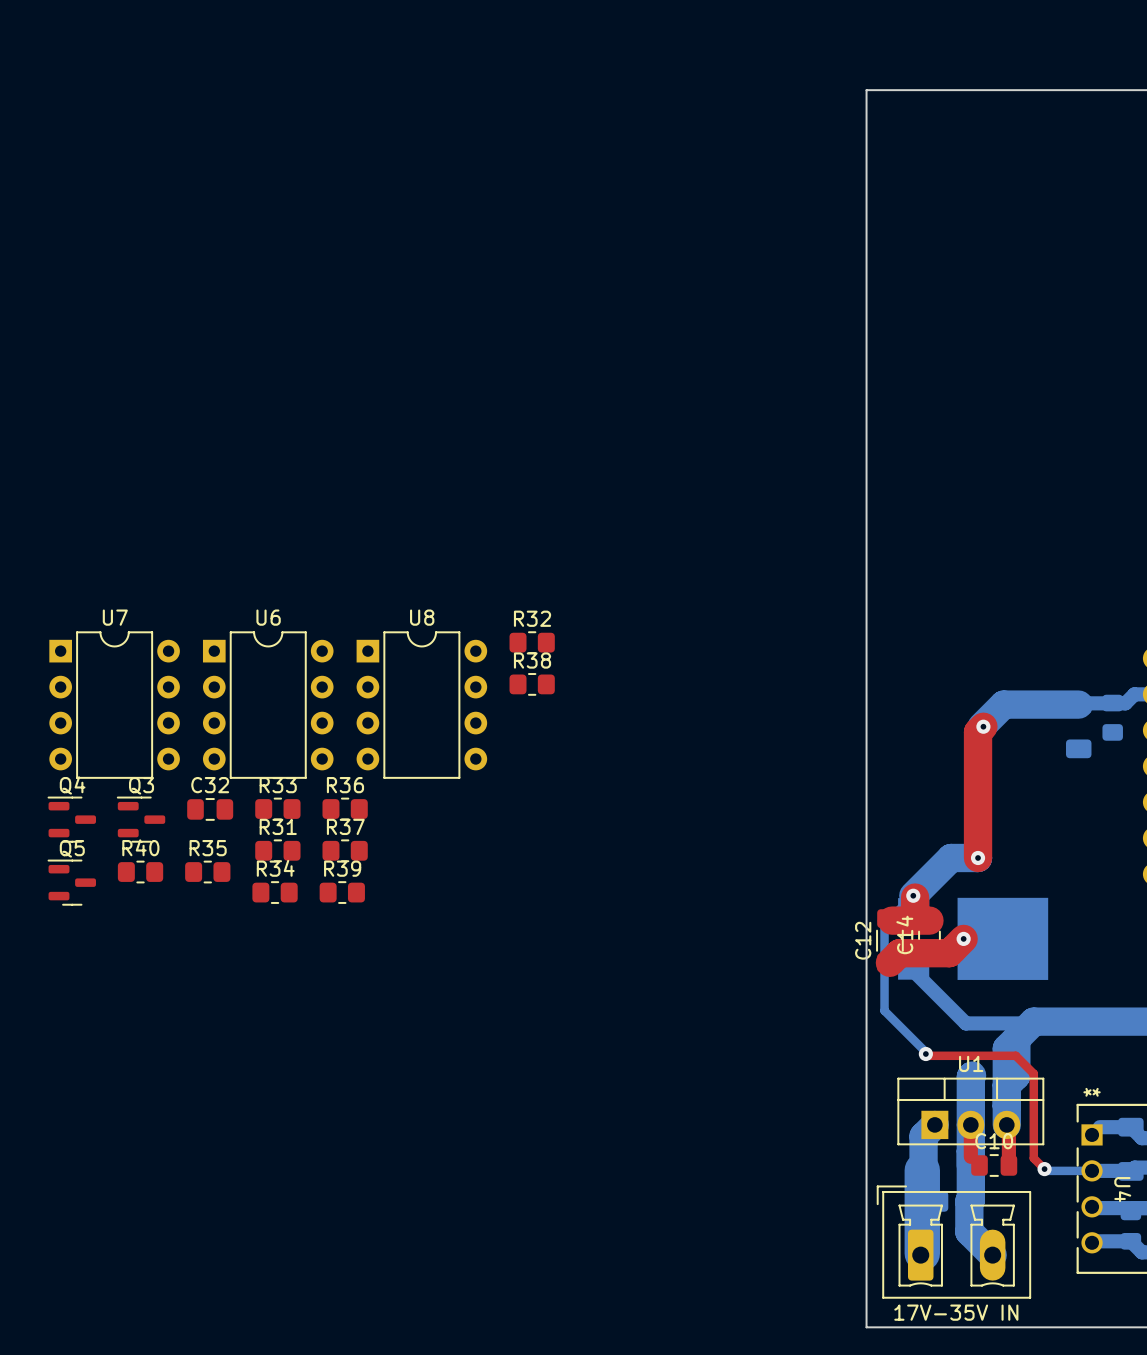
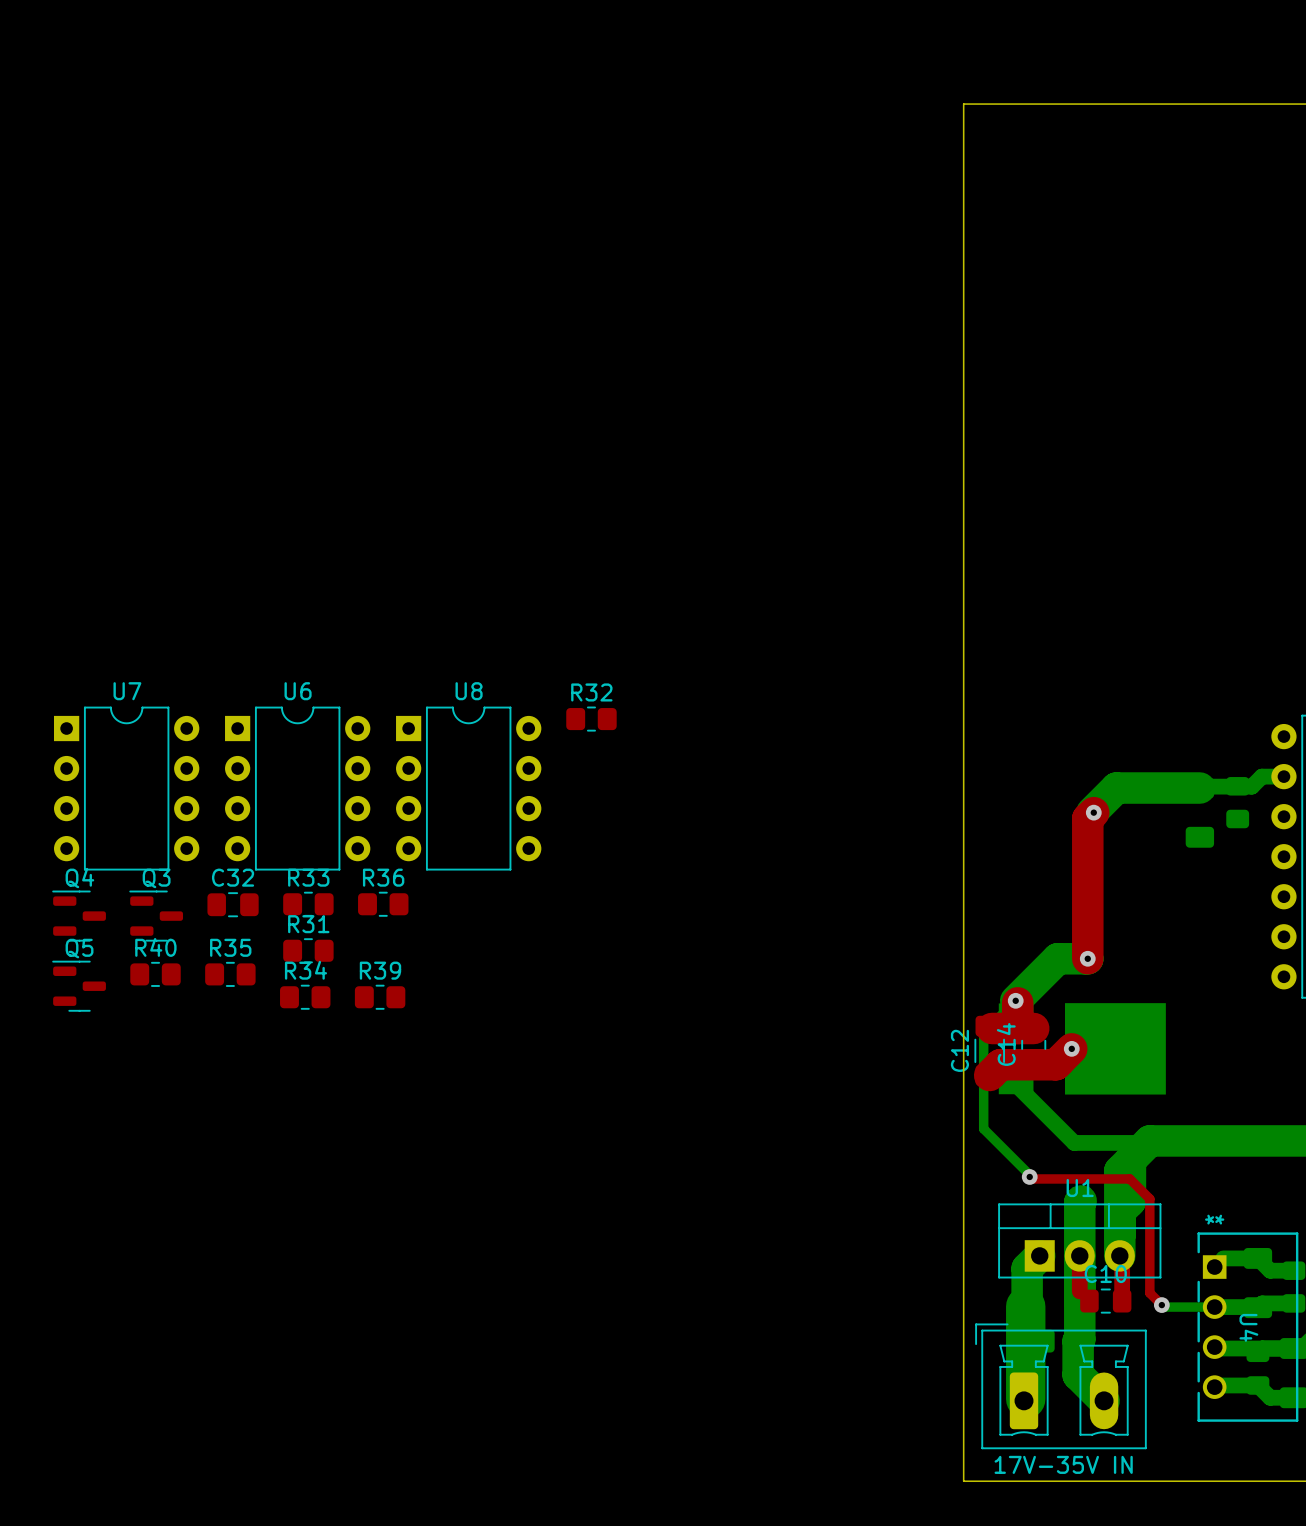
R38: (532, 684) -> none
R37: (345, 850) -> none

